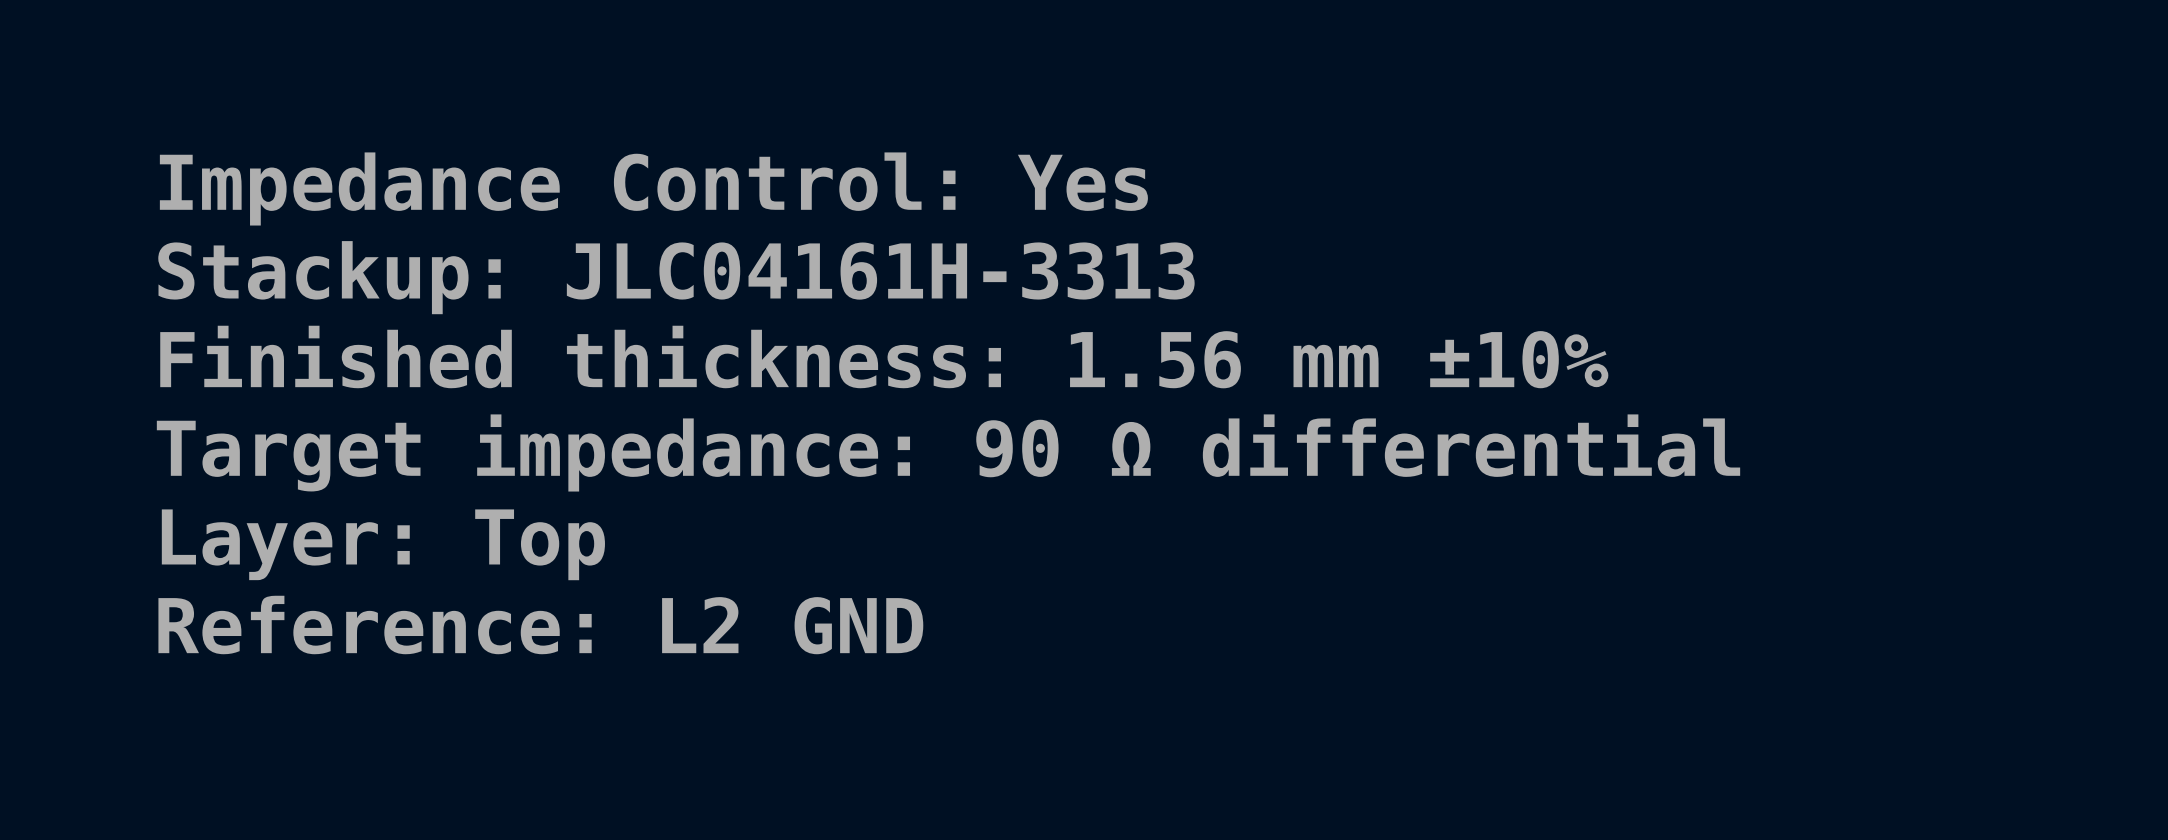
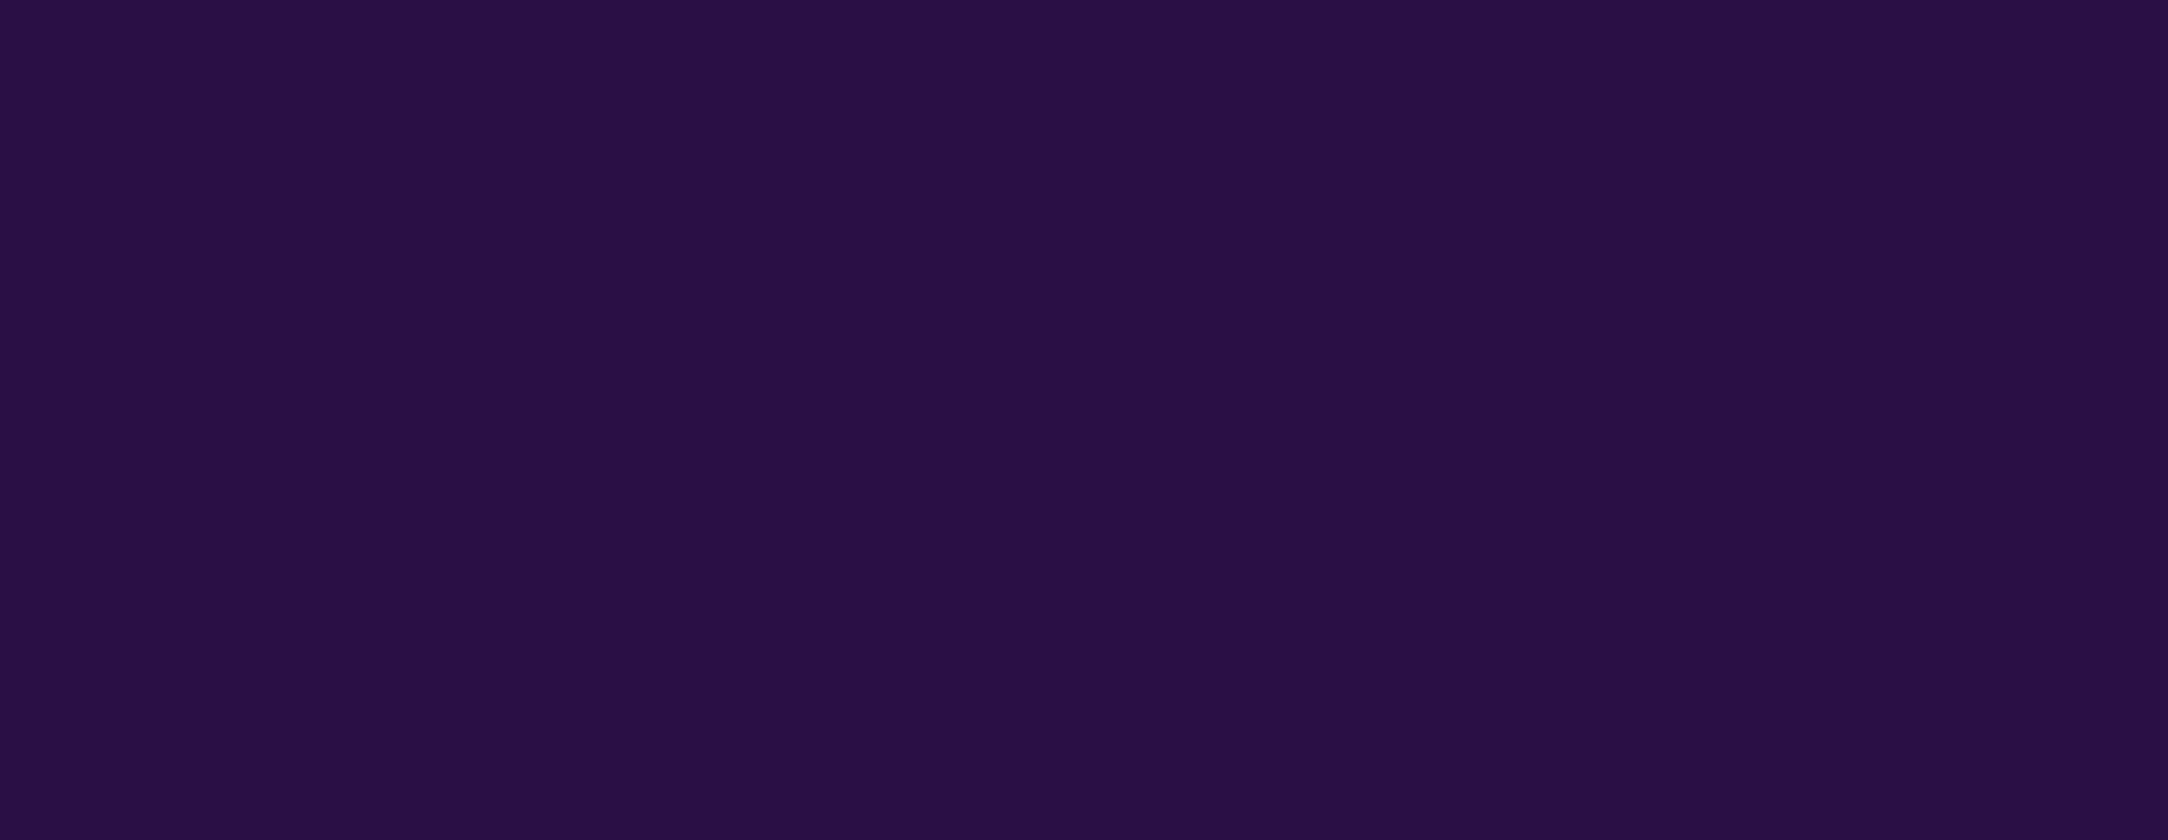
text: Impedance Control: Yes (653, 188) -> none
text: Stackup: JLC04161H-3313 (676, 277) -> none
text: Finished thickness: 1.56 mm ±10% (884, 357) -> none
text: Target impedance: 90 Ω differential (948, 452) -> none
text: Layer: Top (383, 544) -> none
text: Reference: L2 GND (540, 624) -> none

